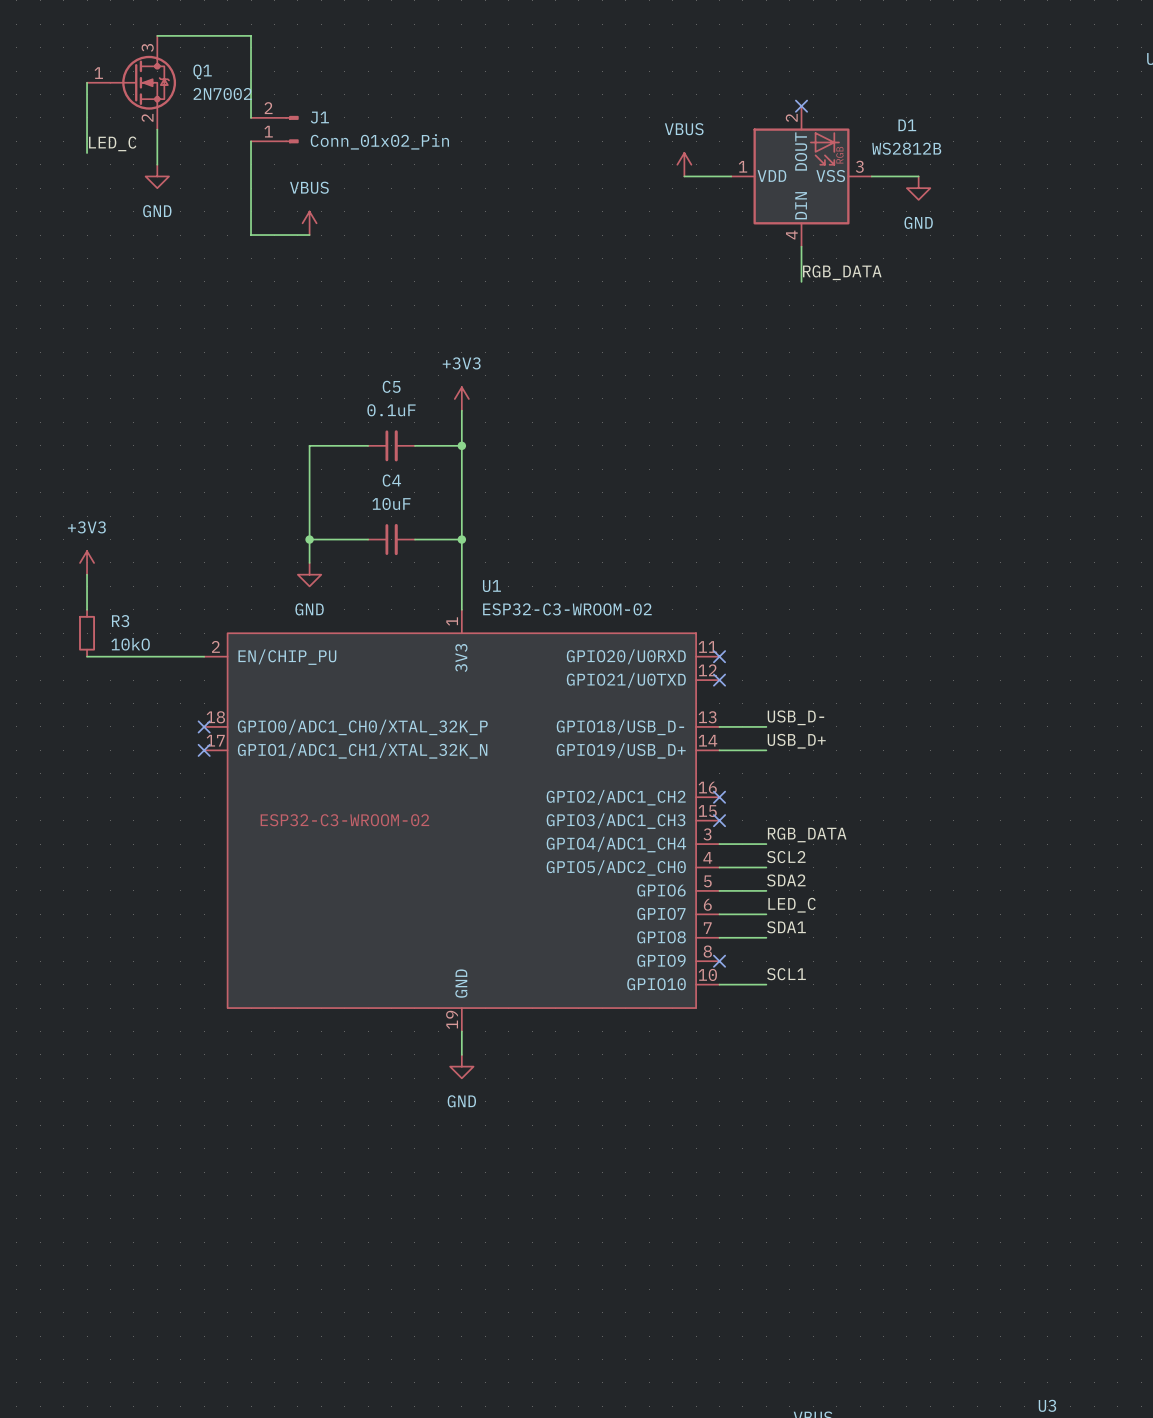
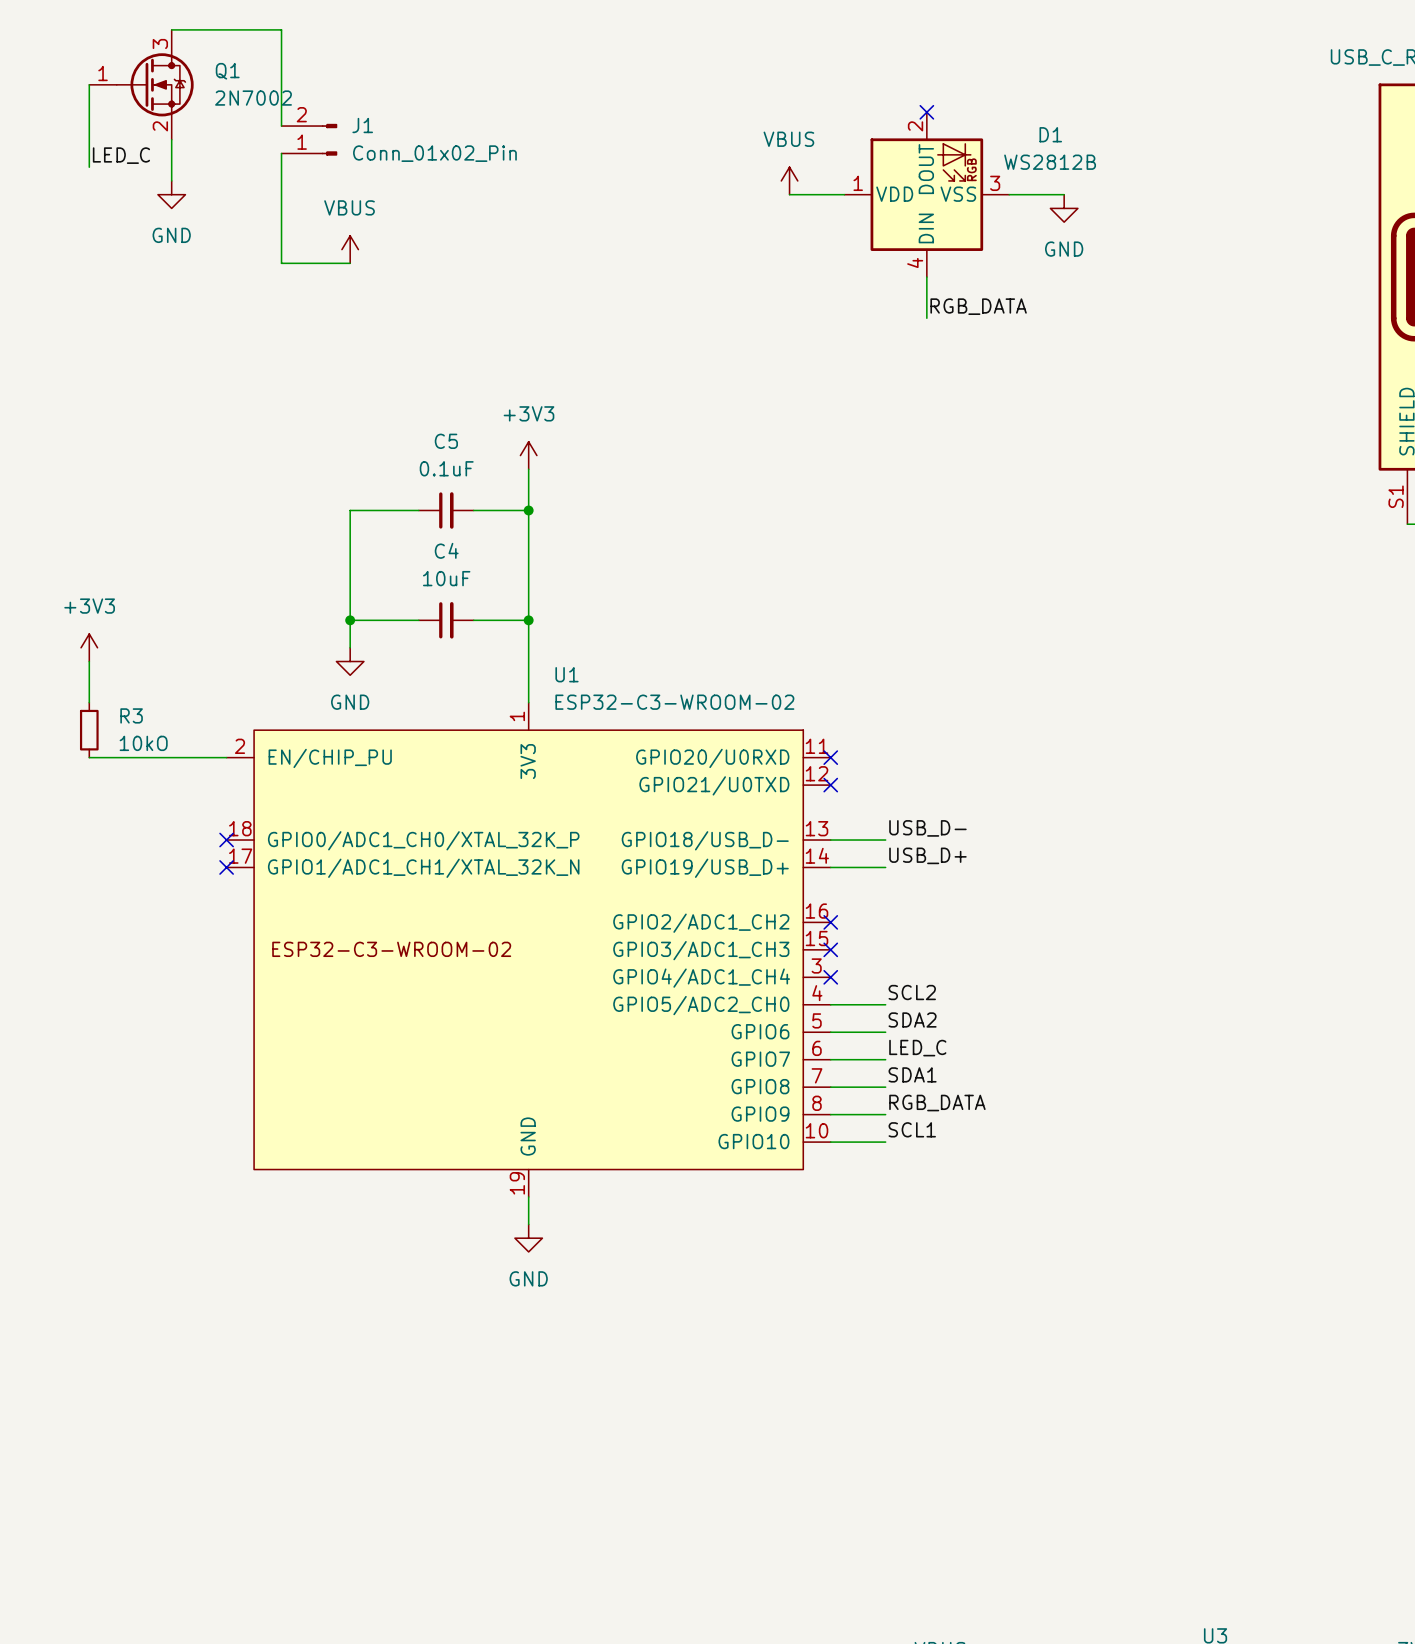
label position: RGB_DATA (807, 834) -> RGB_DATA (937, 1103)
wire: (719, 844) (766, 844) -> (830, 1114) (885, 1114)
no-connect mark: none -> (830, 977)
no-connect mark: (719, 961) -> none

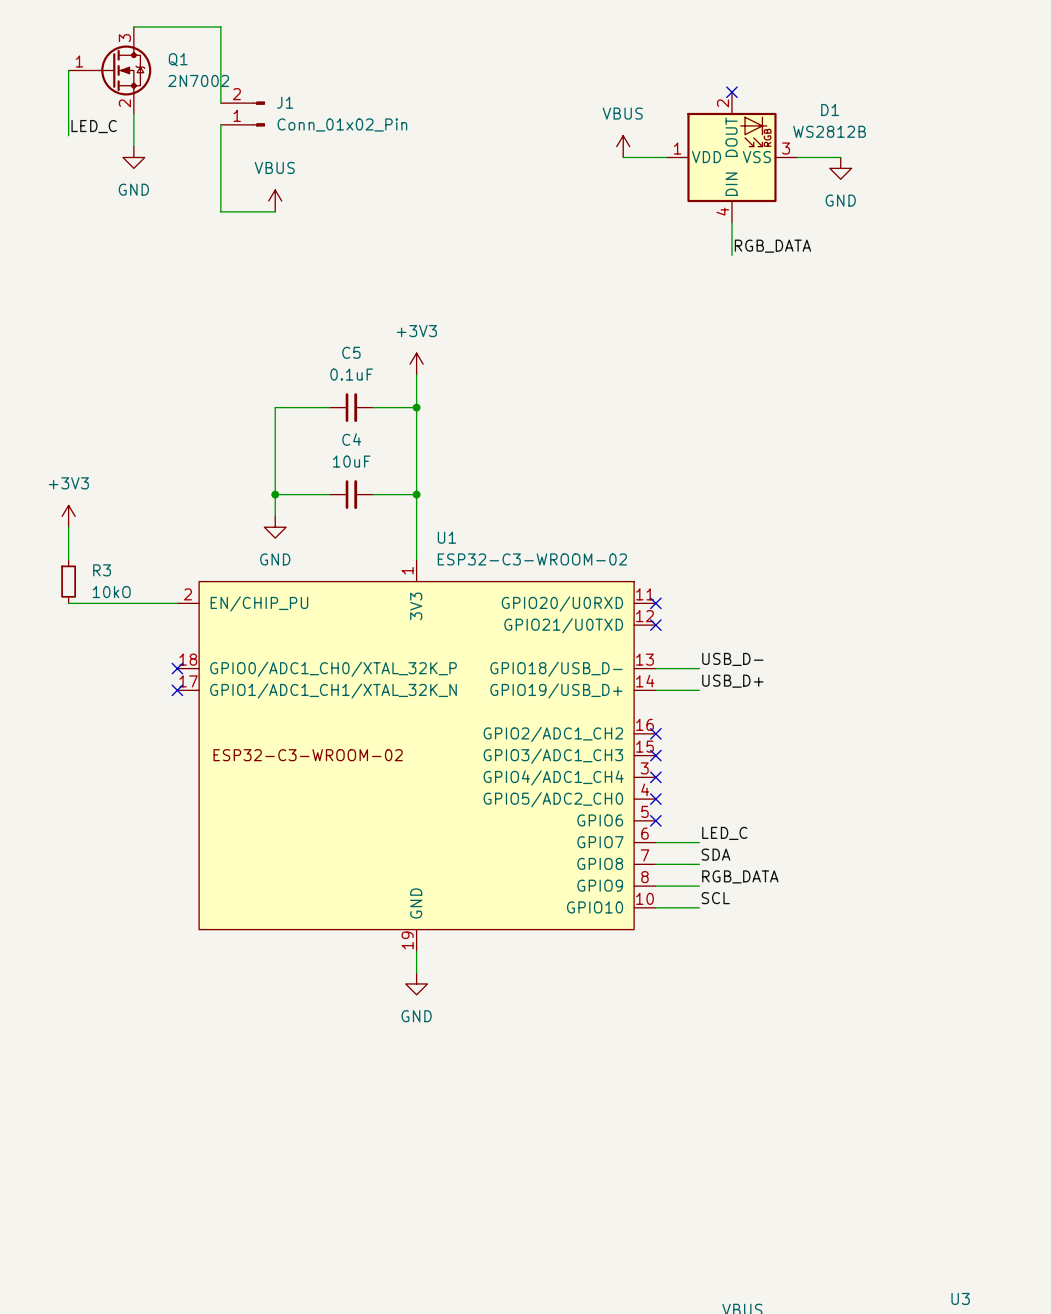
label: SCL2 (912, 992) -> none
wire: (830, 1004) (885, 1004) -> none
no-connect mark: none -> (655, 799)
label: SDA2 (912, 1019) -> none
wire: (830, 1032) (885, 1032) -> none
no-connect mark: none -> (655, 820)
label: SDA1 (912, 1074) -> SDA (716, 854)
label: SCL1 (912, 1129) -> SCL (715, 898)

